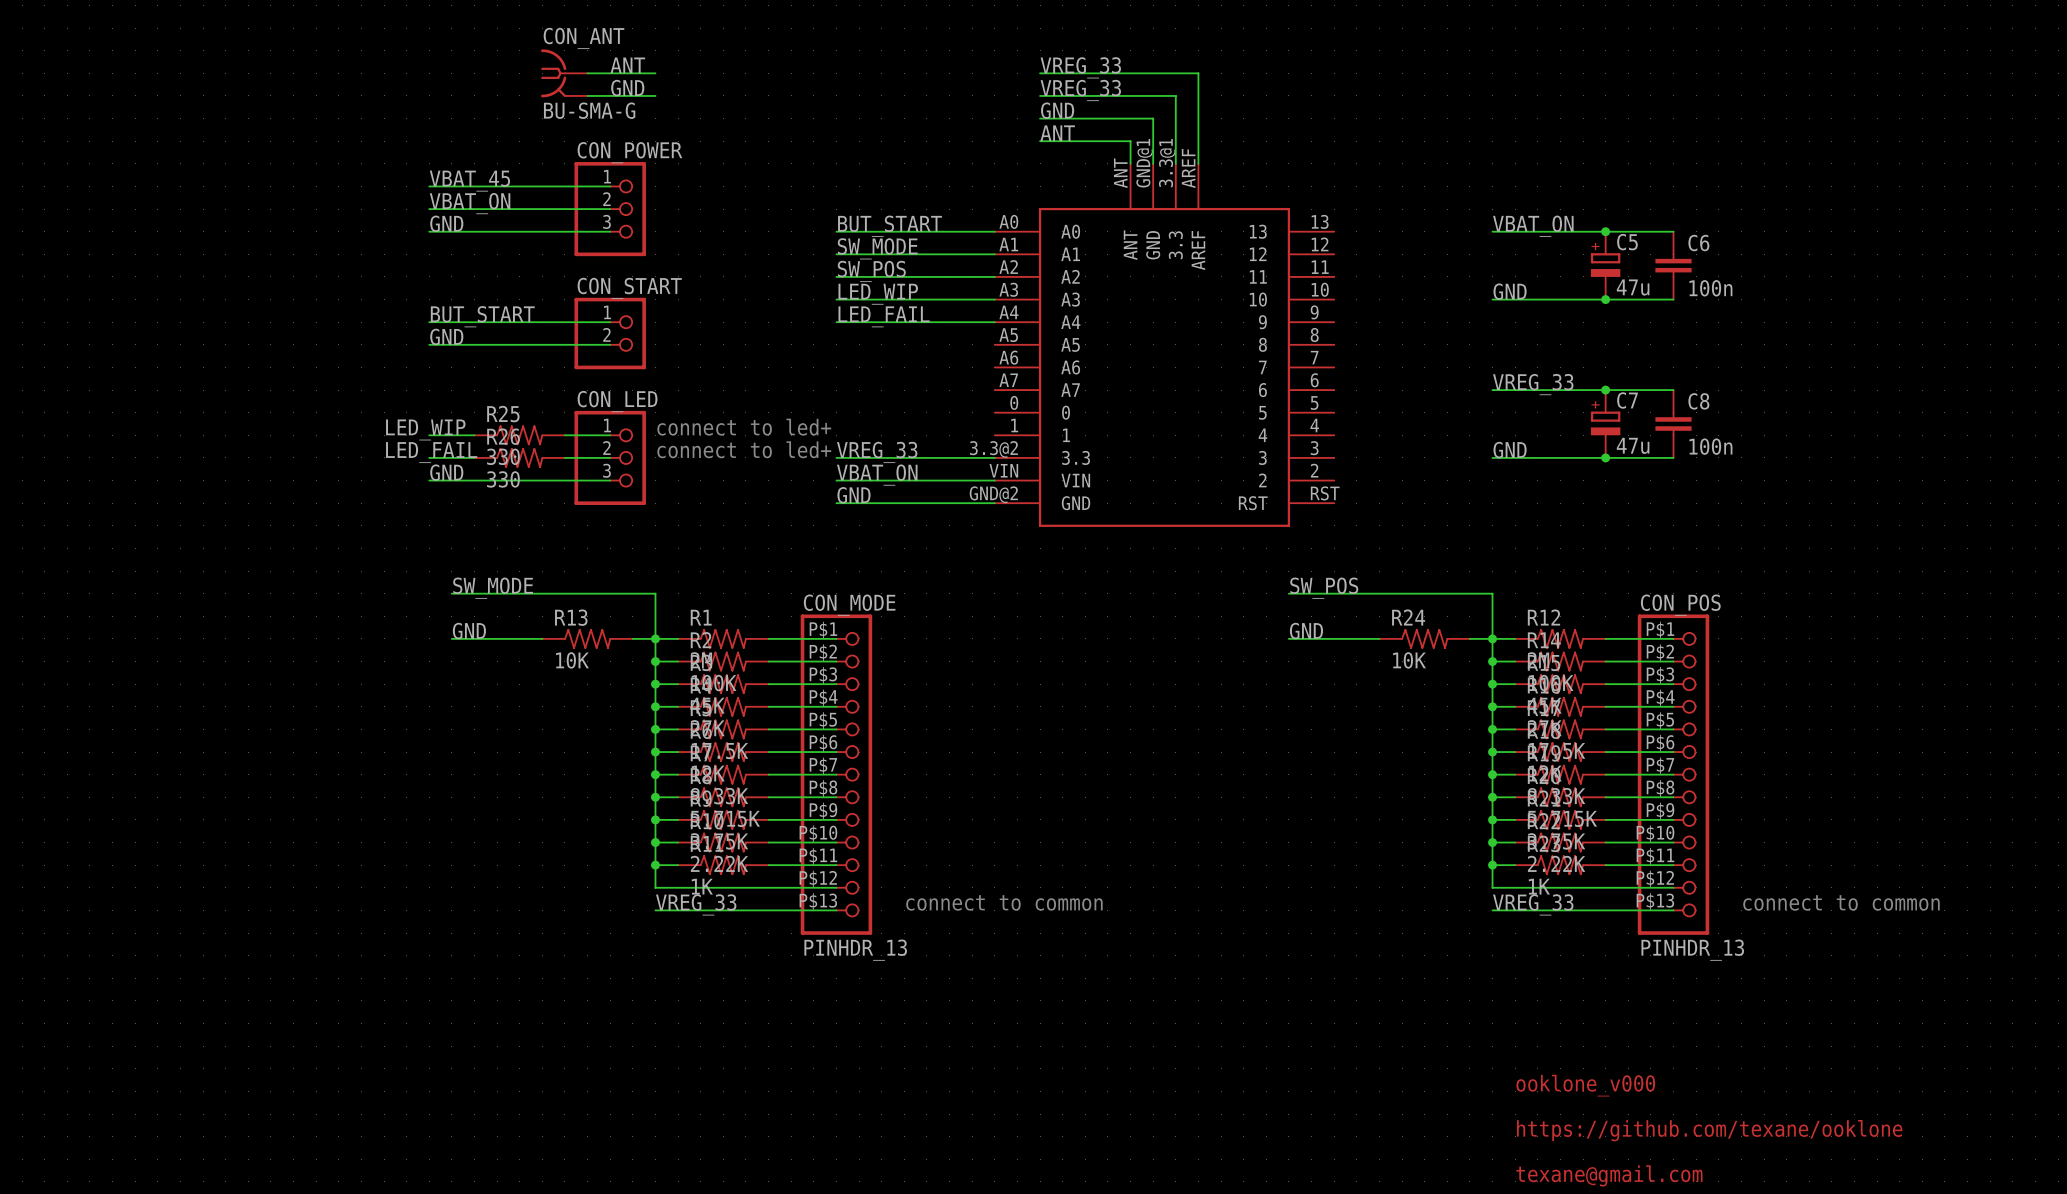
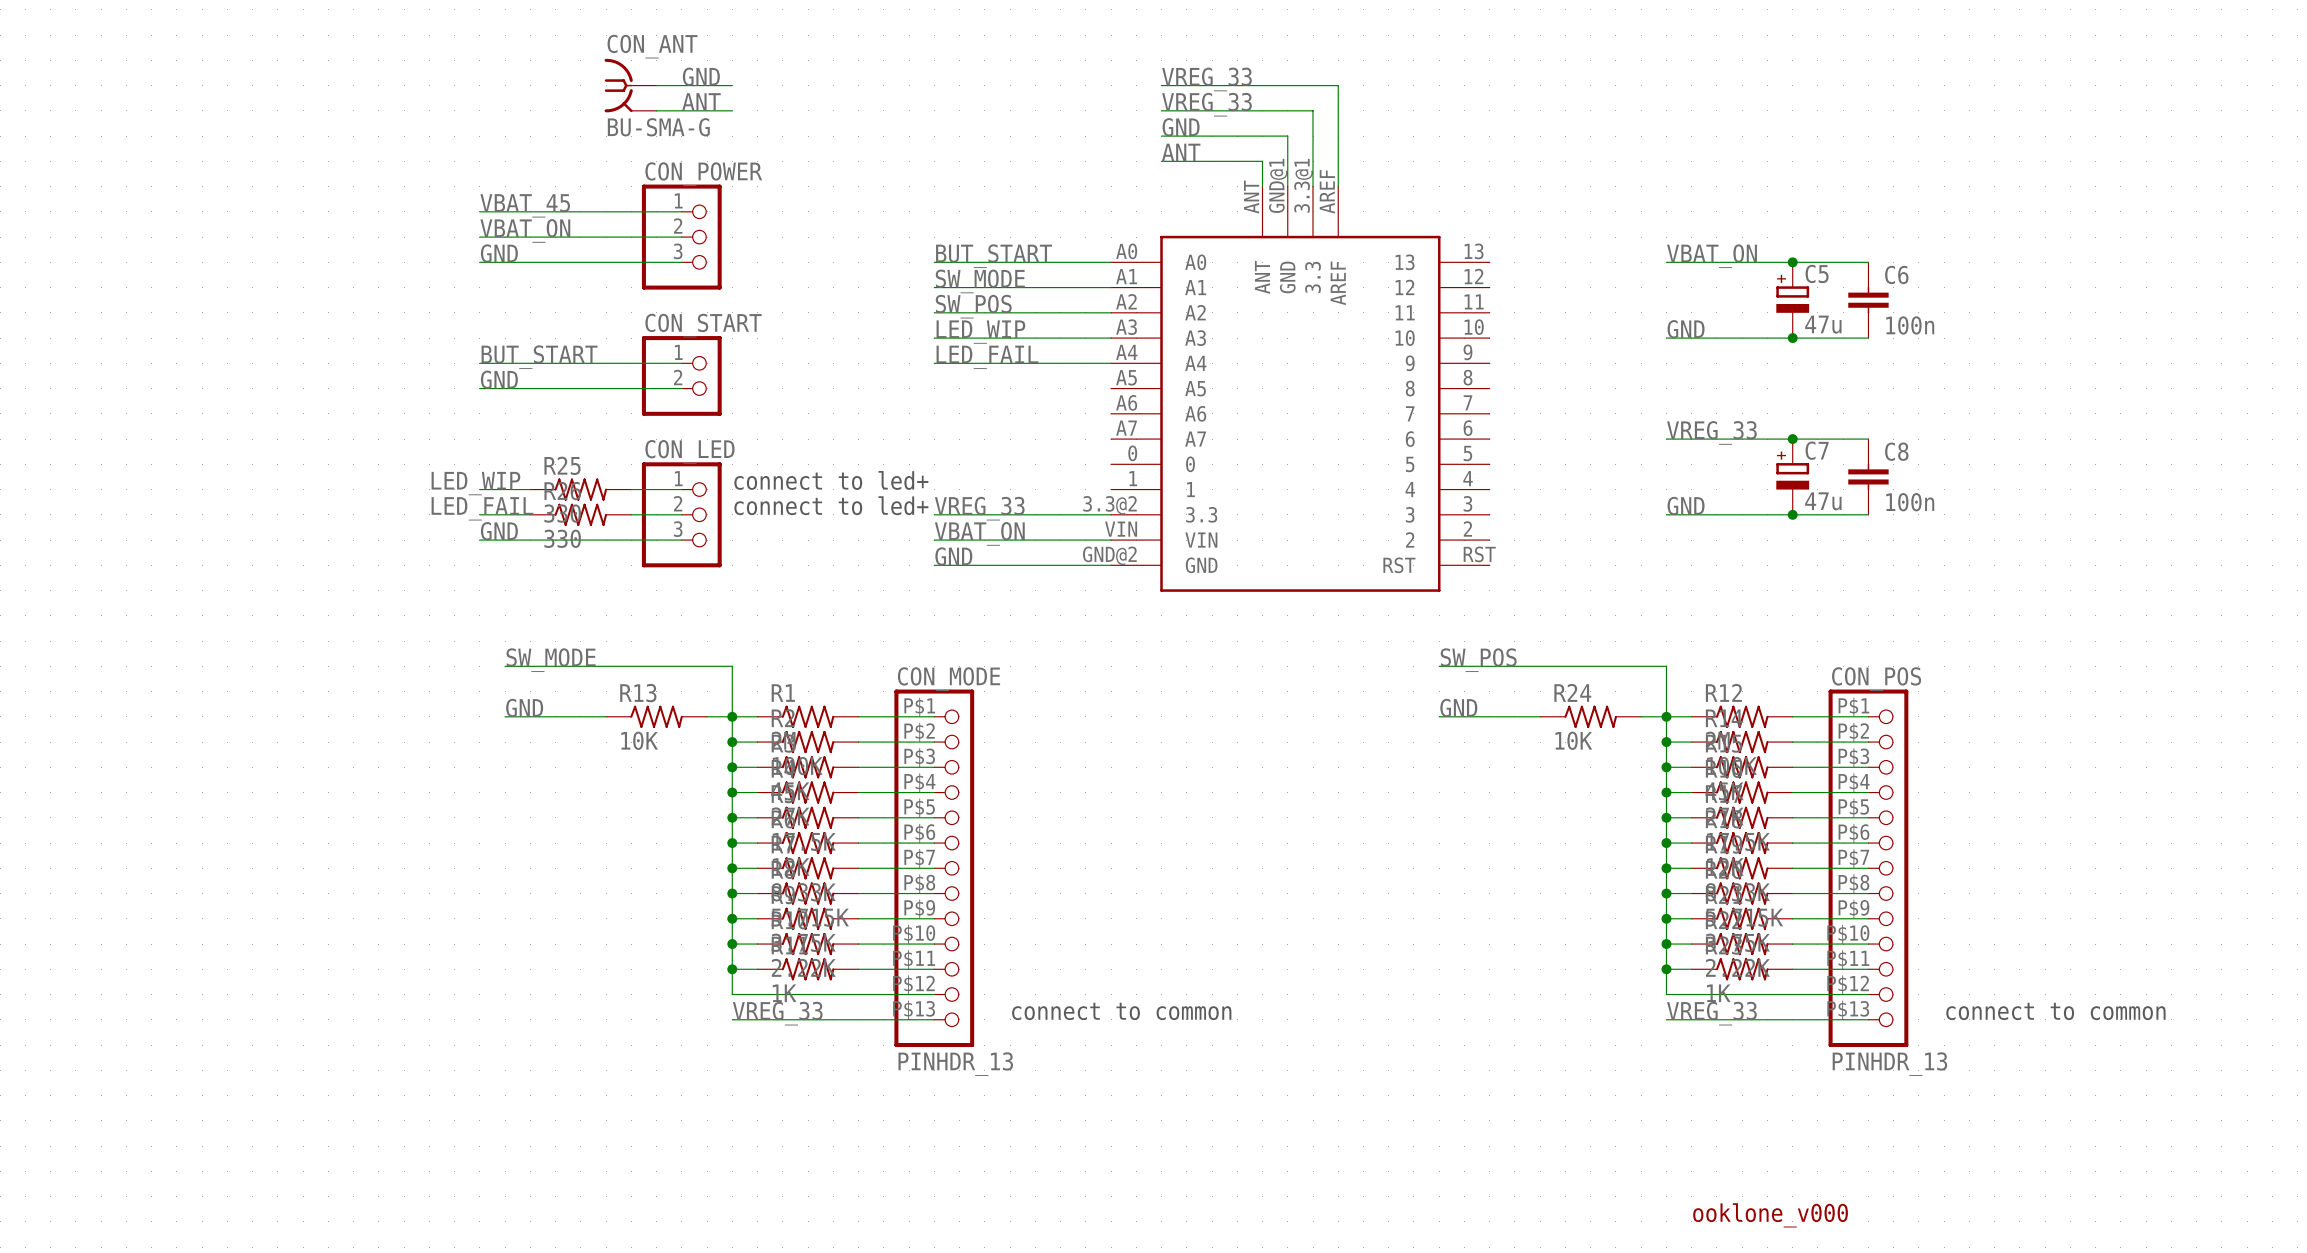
label: ANT (627, 65) -> GND (701, 76)
label: GND (627, 88) -> ANT (701, 102)

